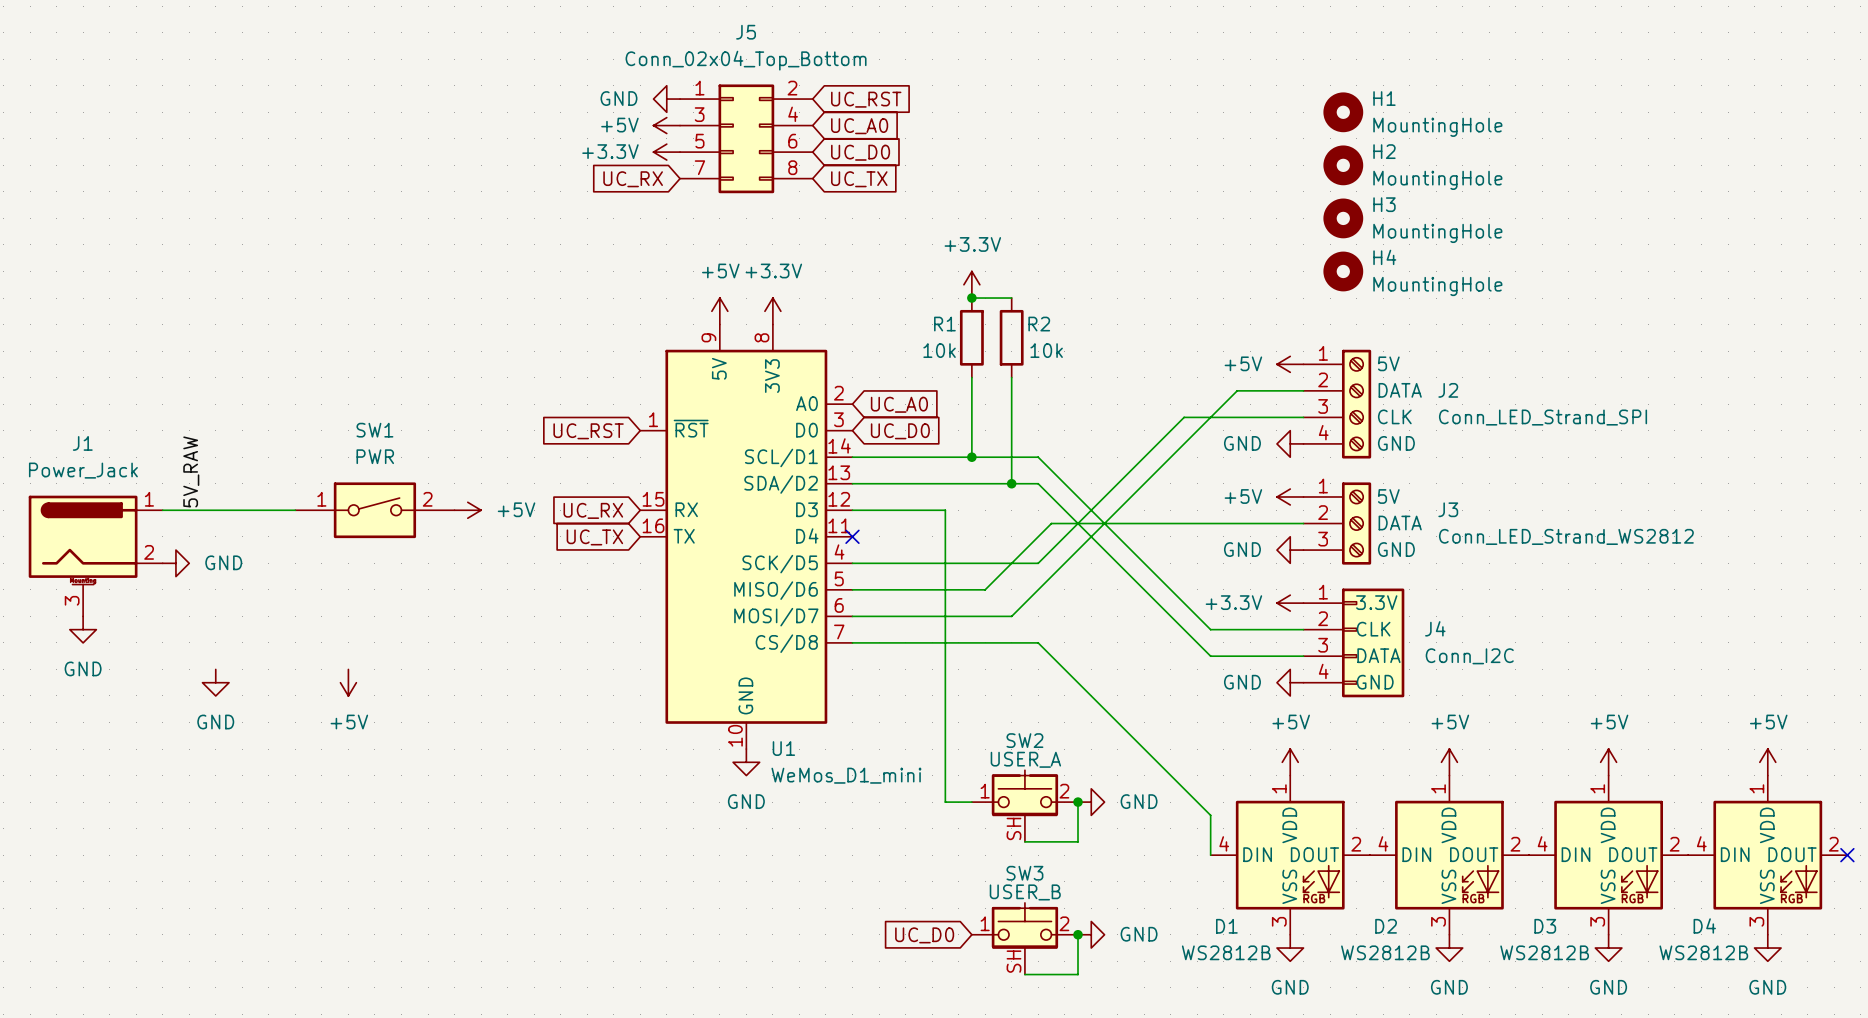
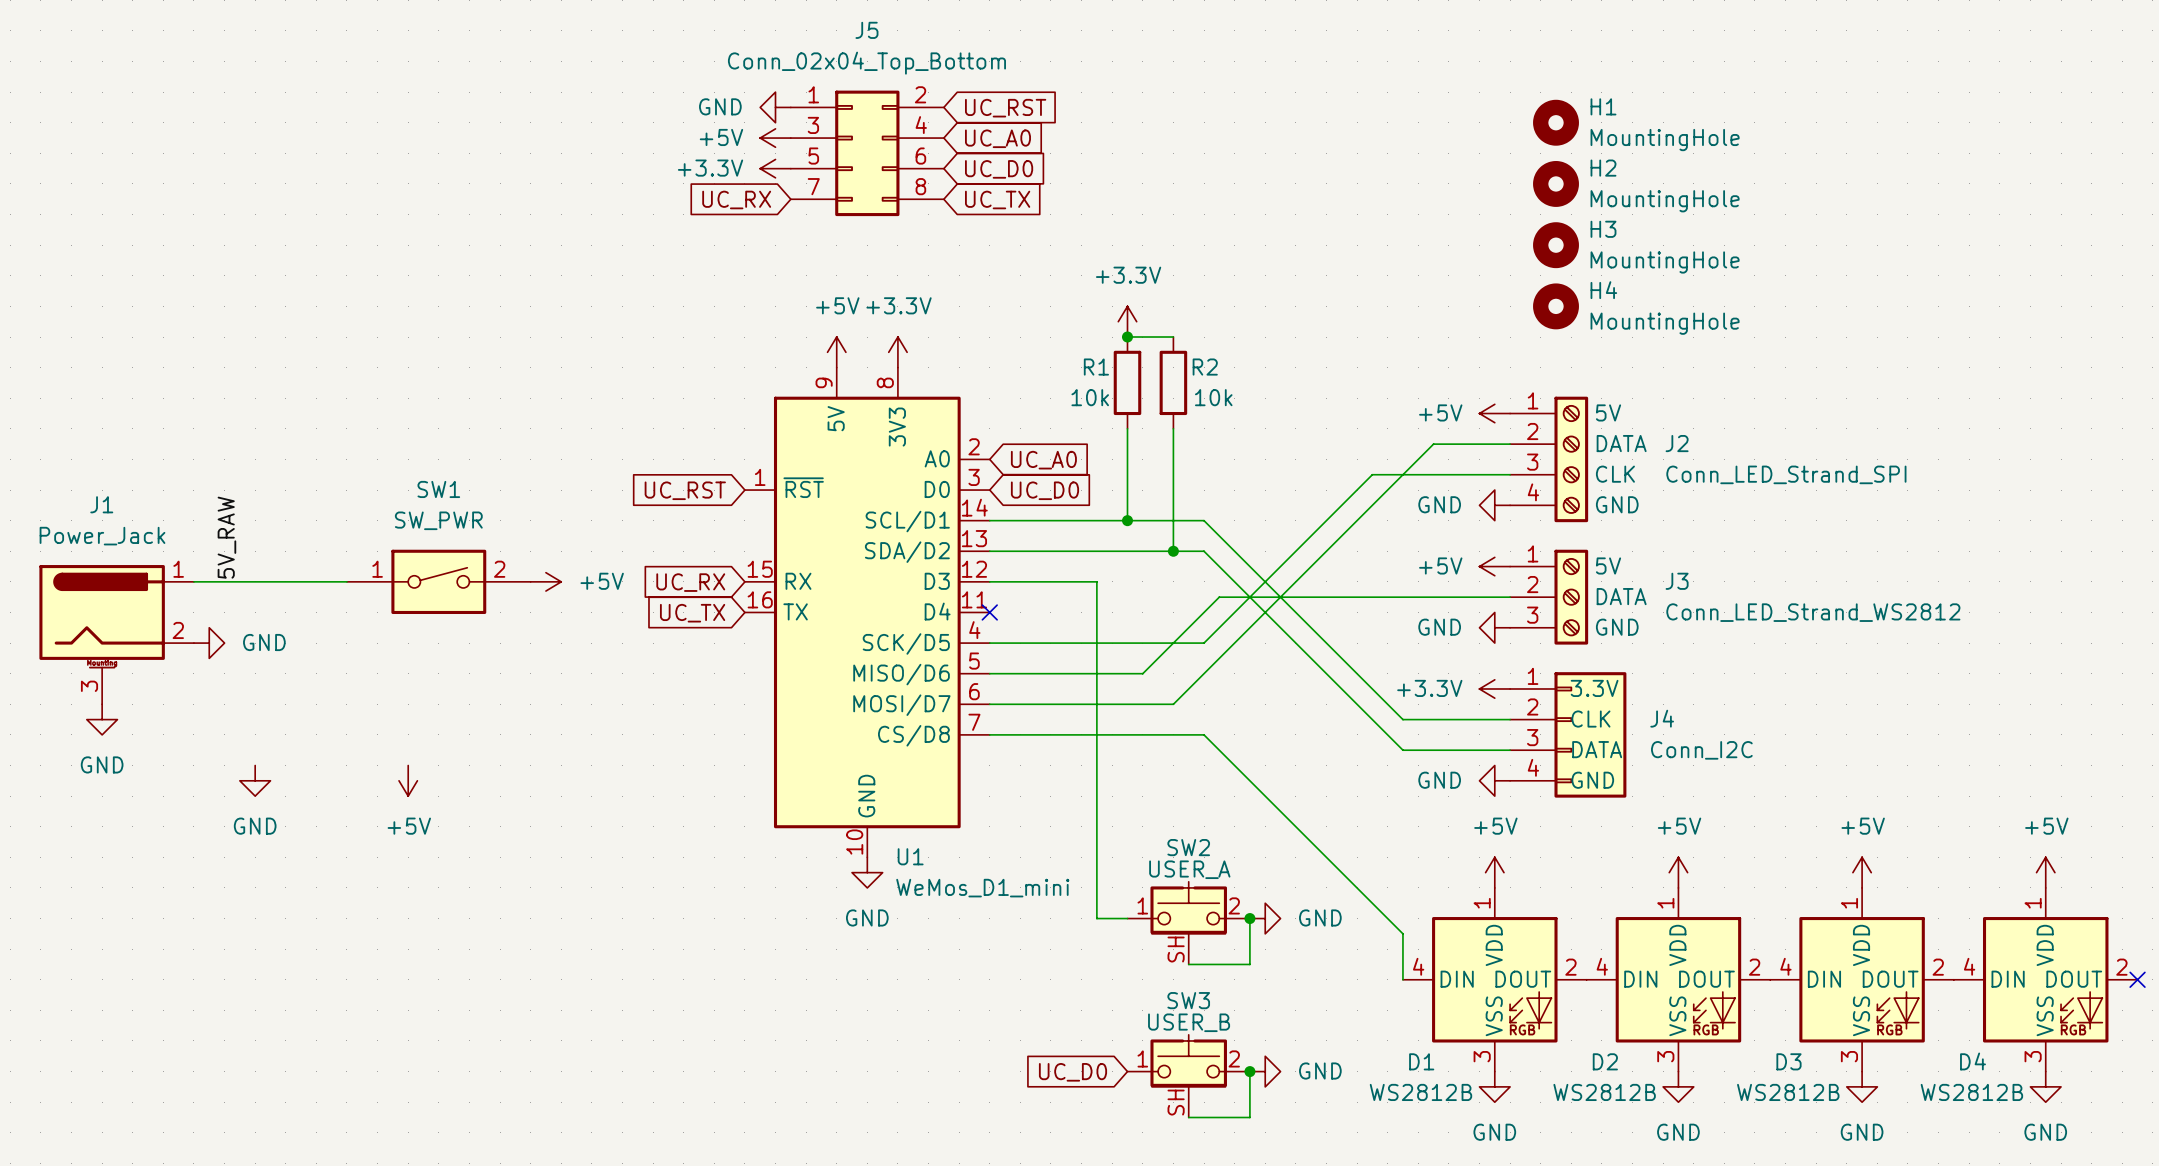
SW1 value: PWR (375, 456) -> SW_PWR (438, 520)

